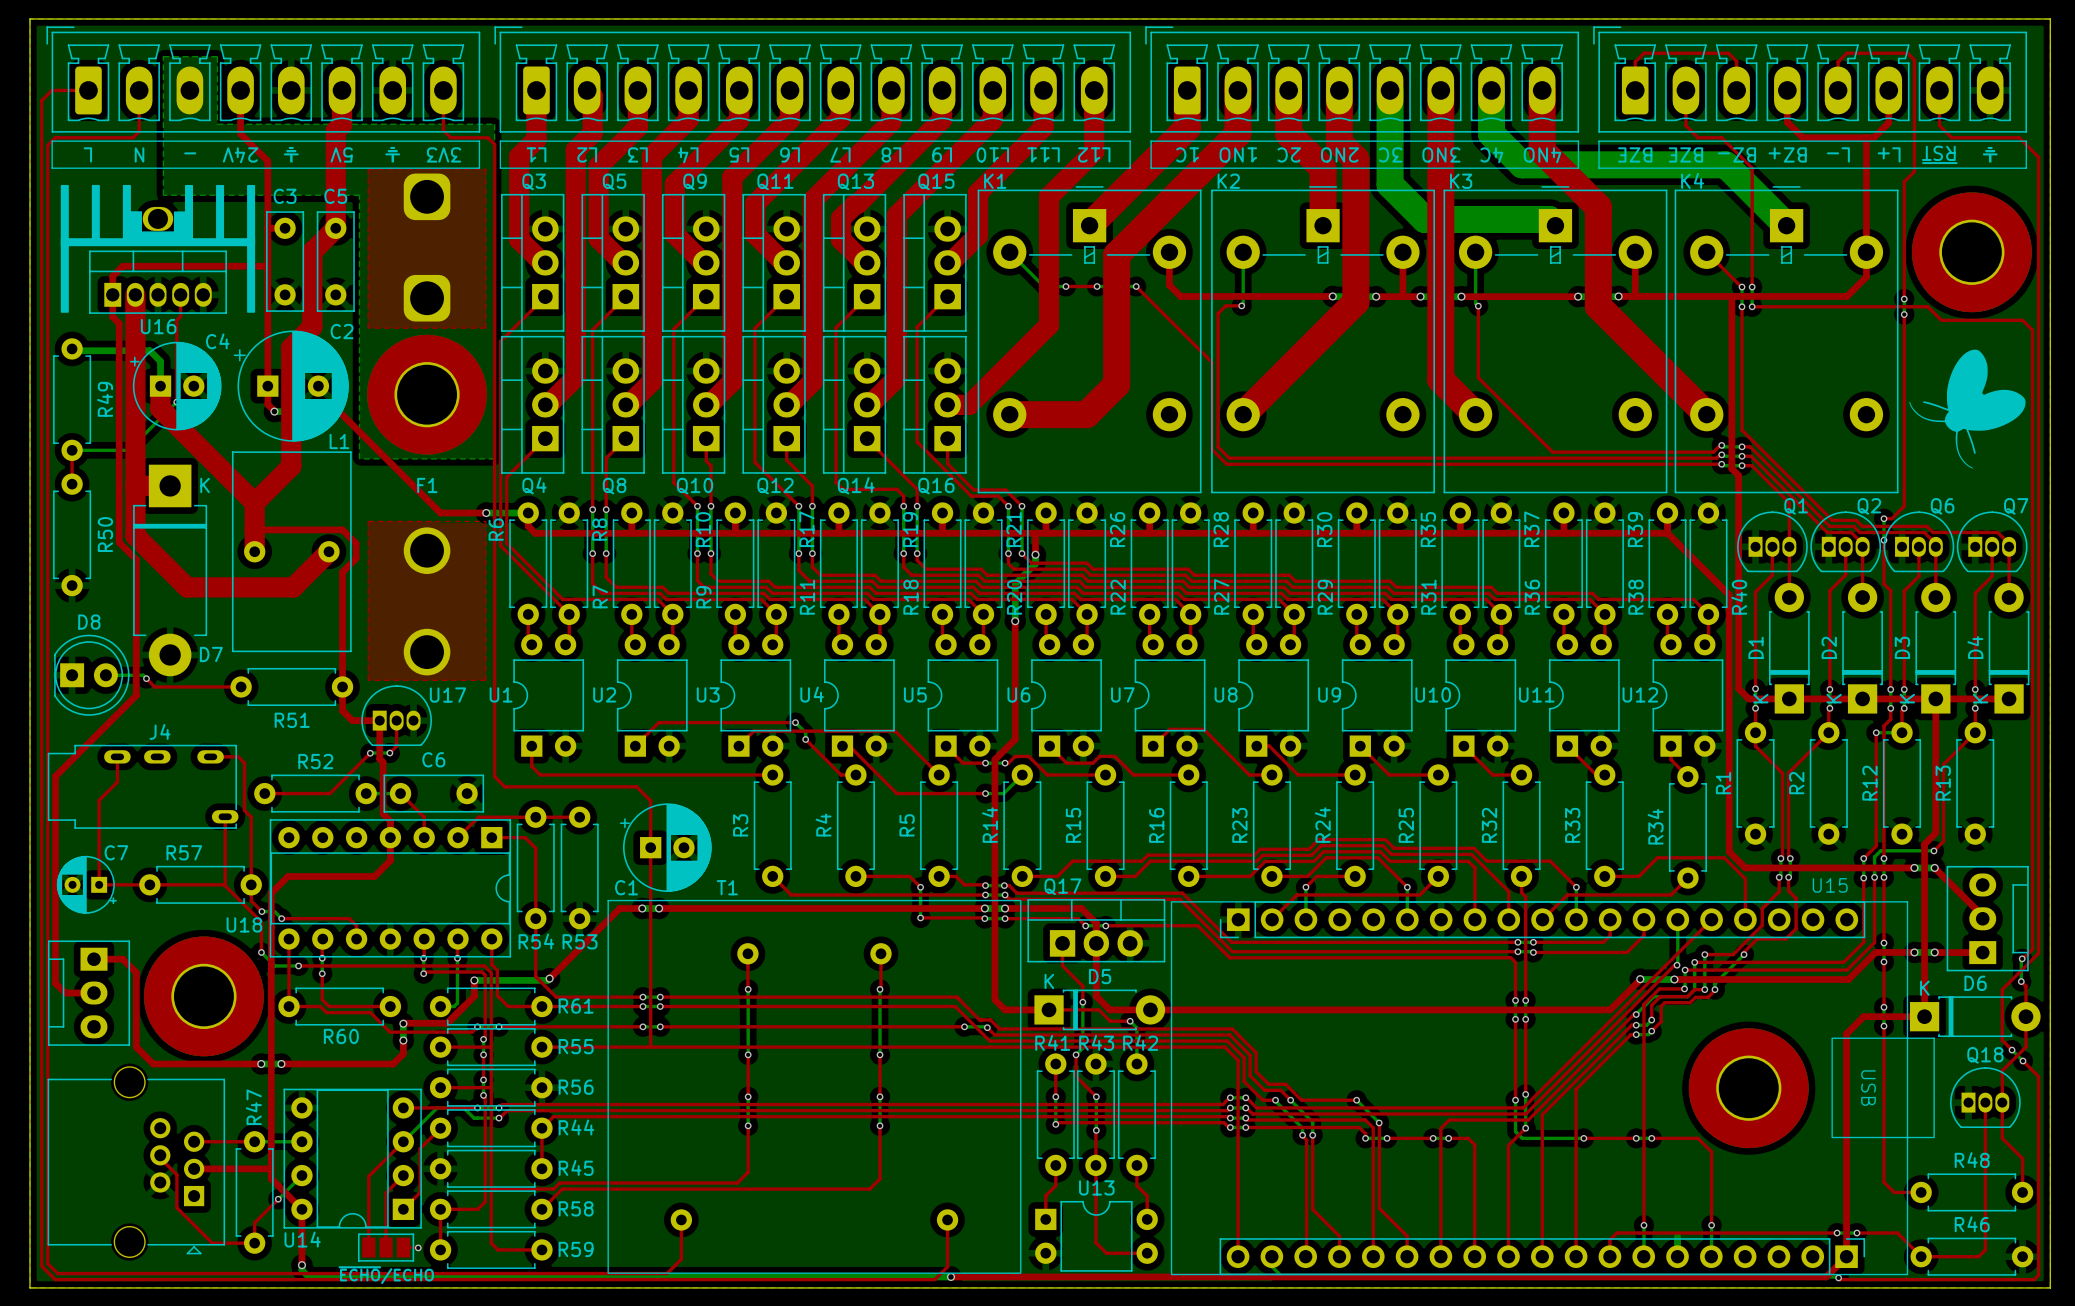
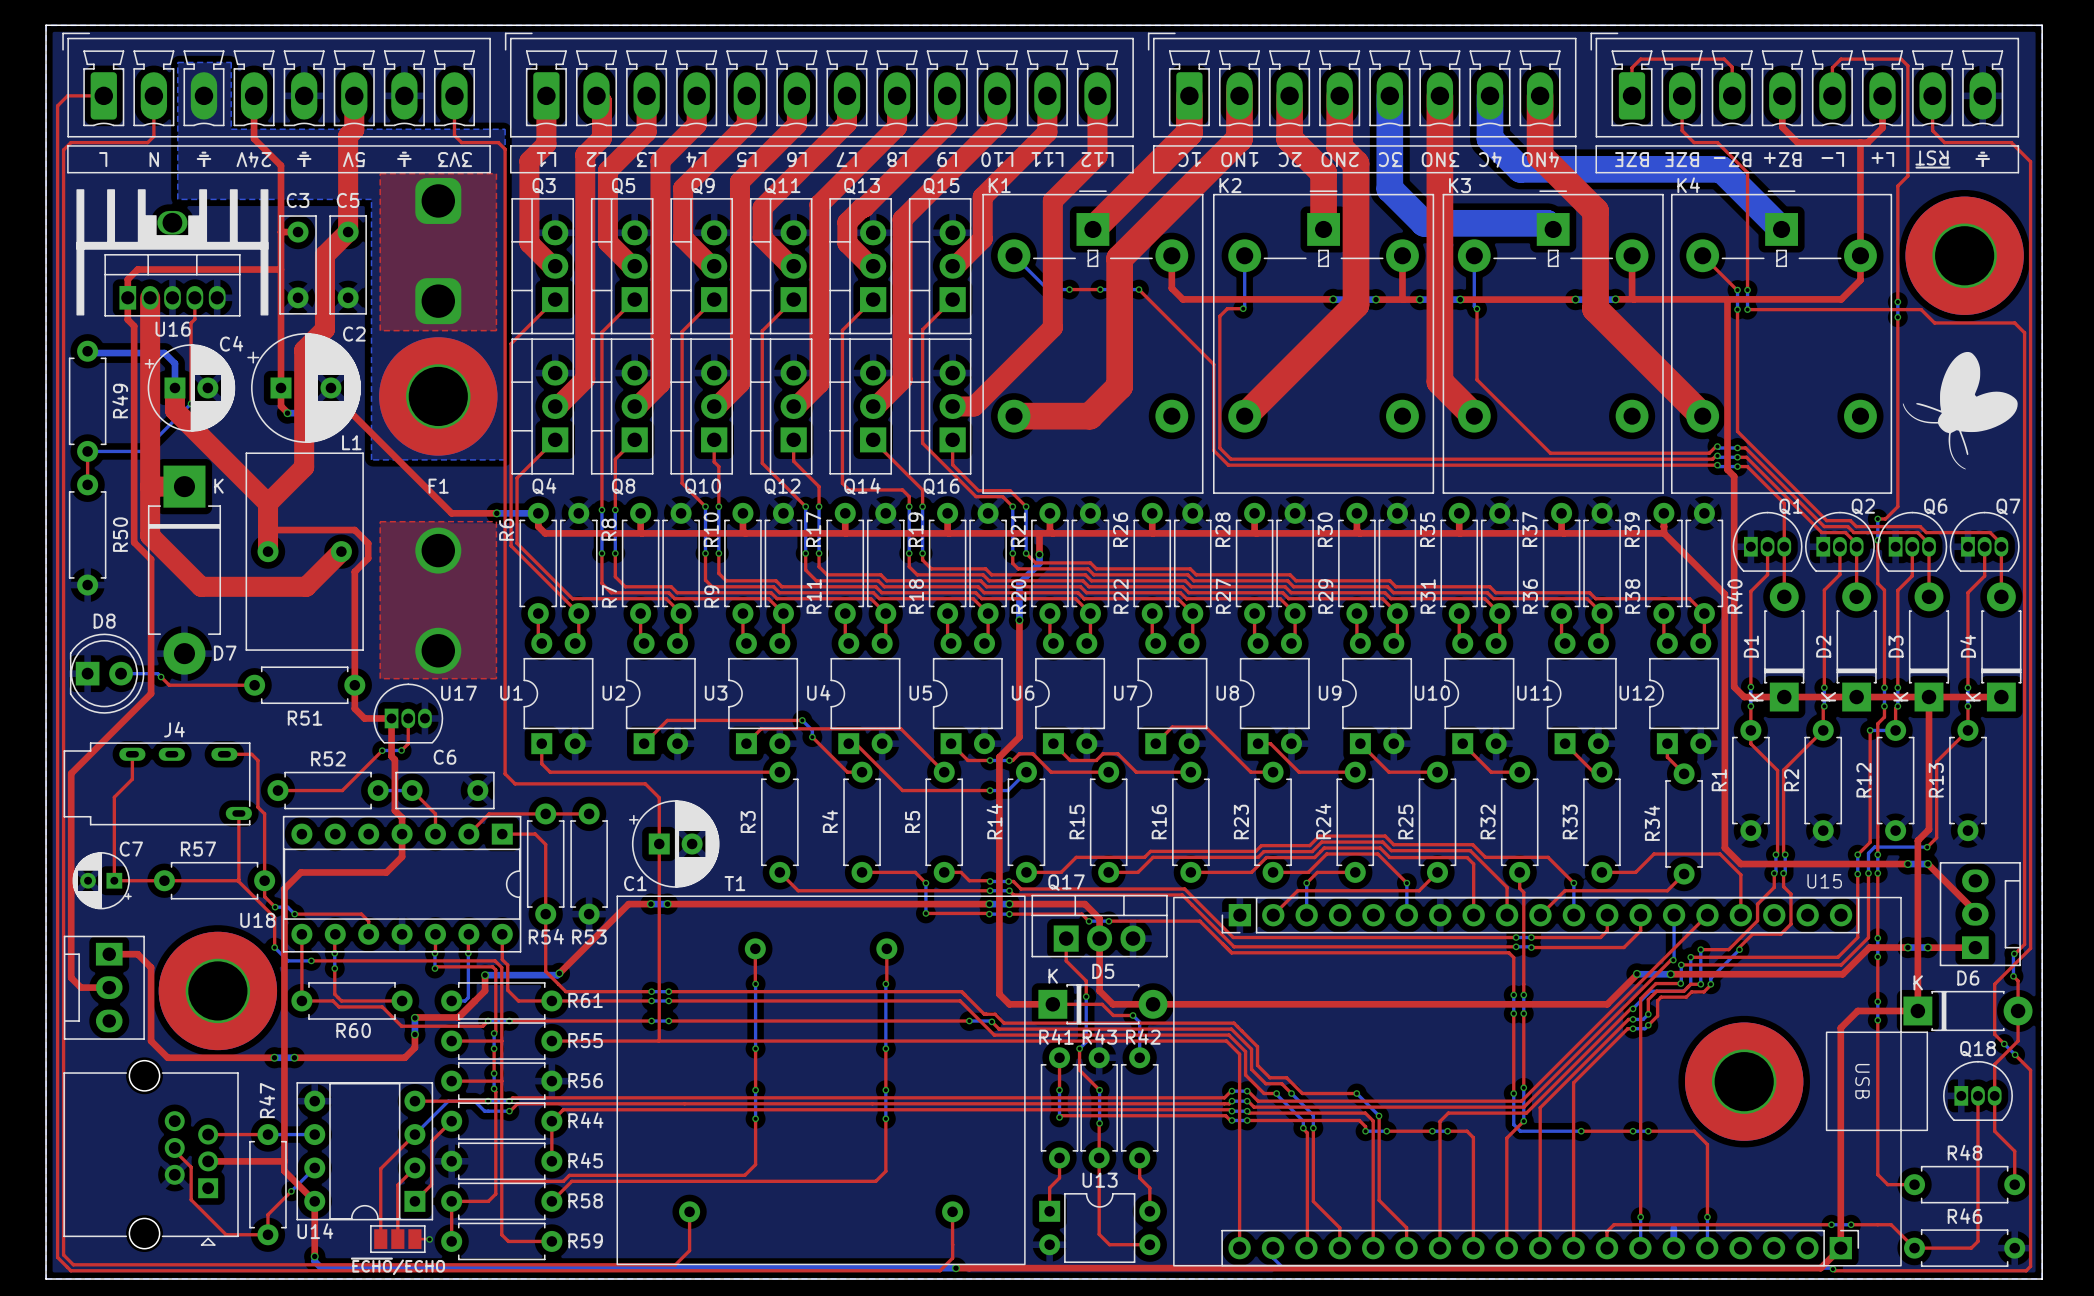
drawing: none -> [196, 151, 212, 167]
text: - (190, 153) -> none

